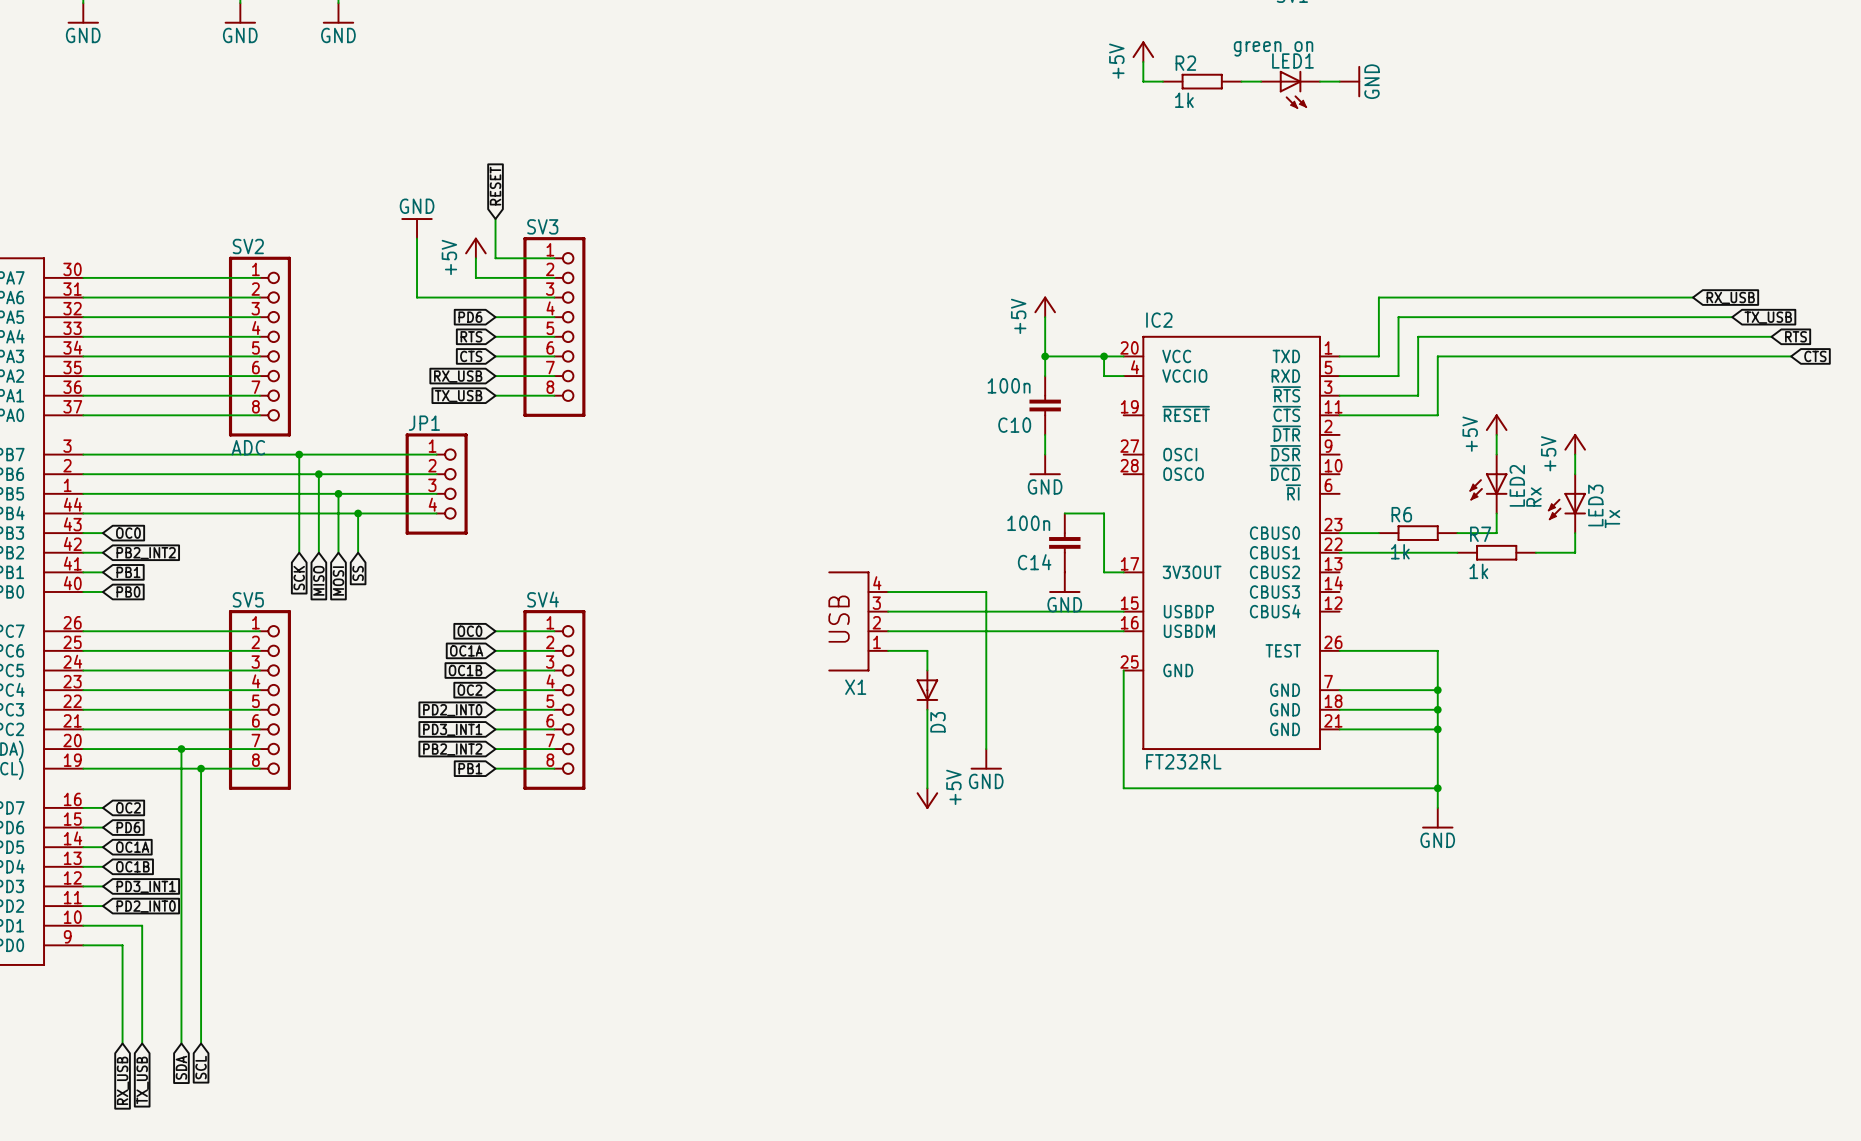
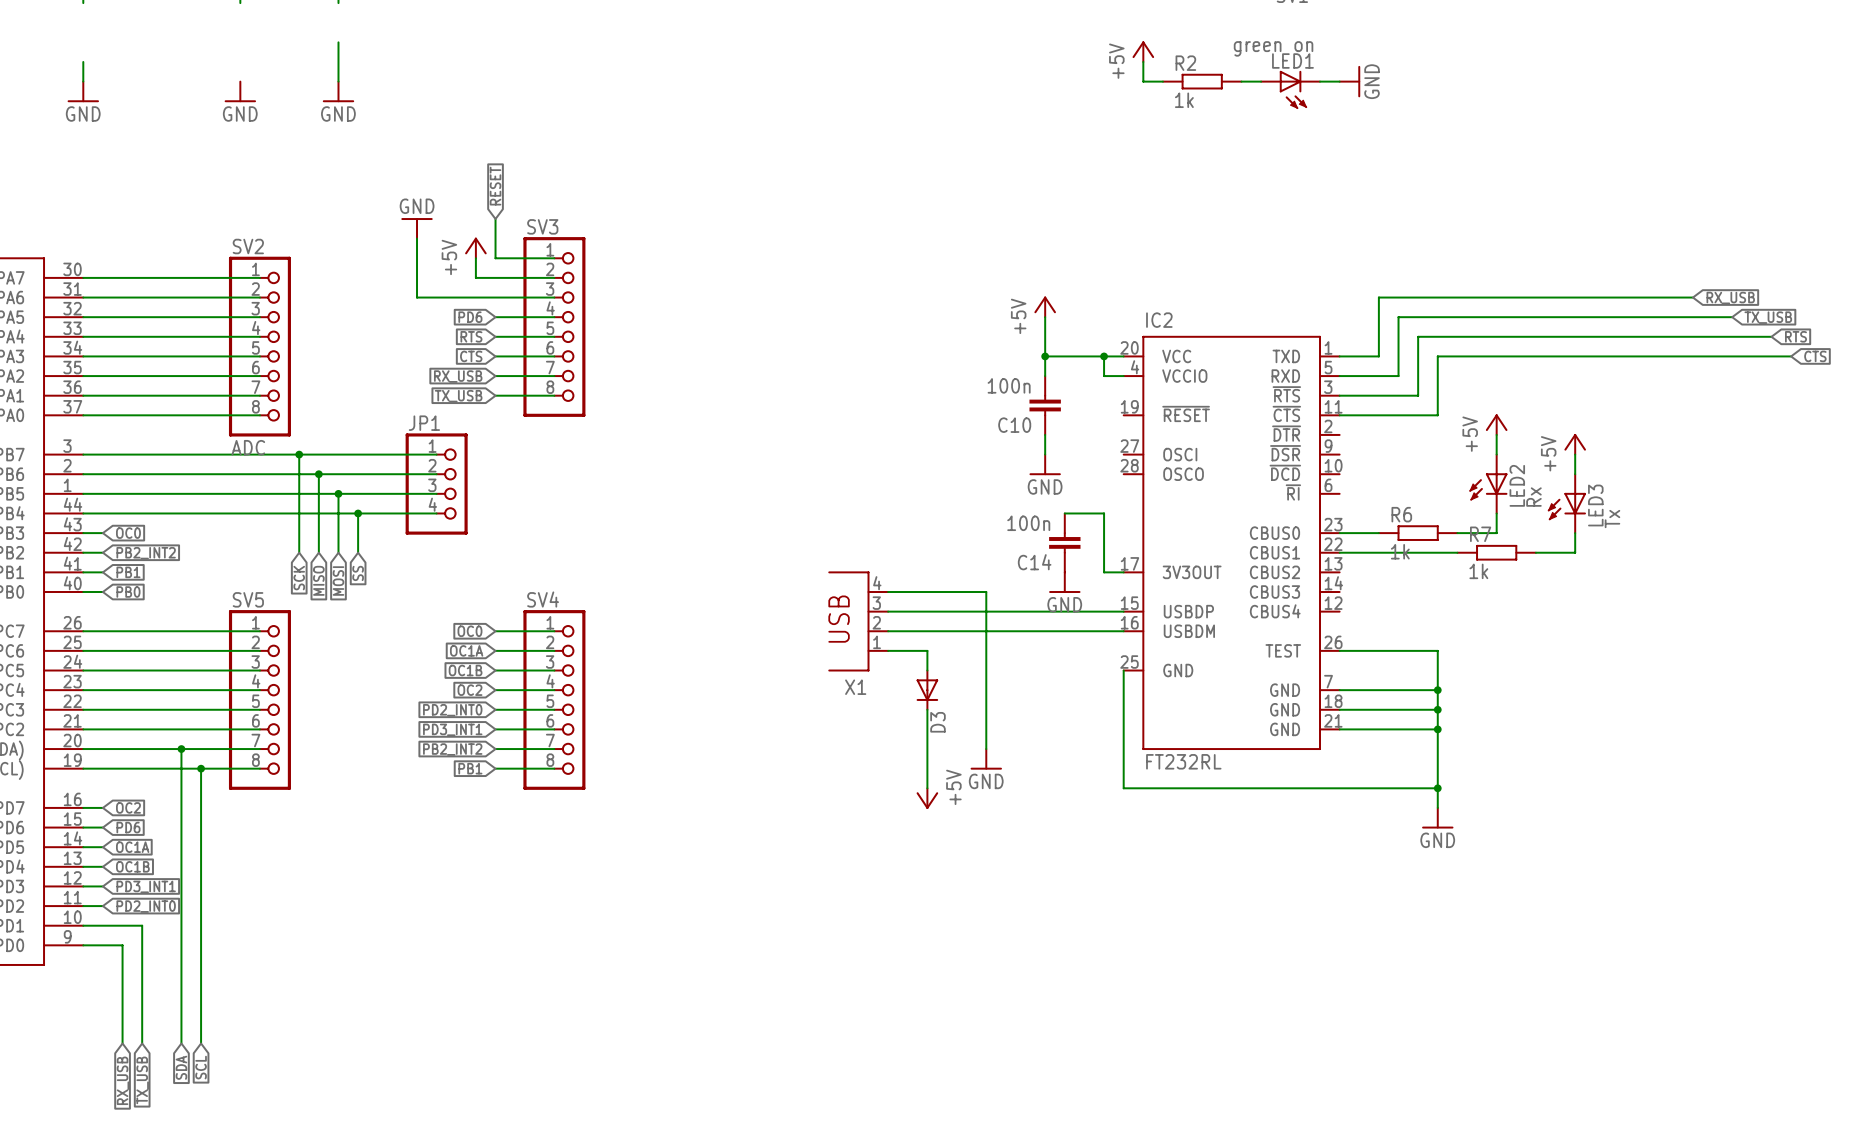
power symbol position: GND (83, 13) -> GND (83, 91)
power symbol: GND (240, 13) -> none
power symbol: GND (338, 13) -> none
wire: none -> (338, 42) (338, 81)
wire: none -> (83, 61) (83, 81)
power symbol: none -> GND (240, 91)
power symbol: none -> GND (338, 91)

